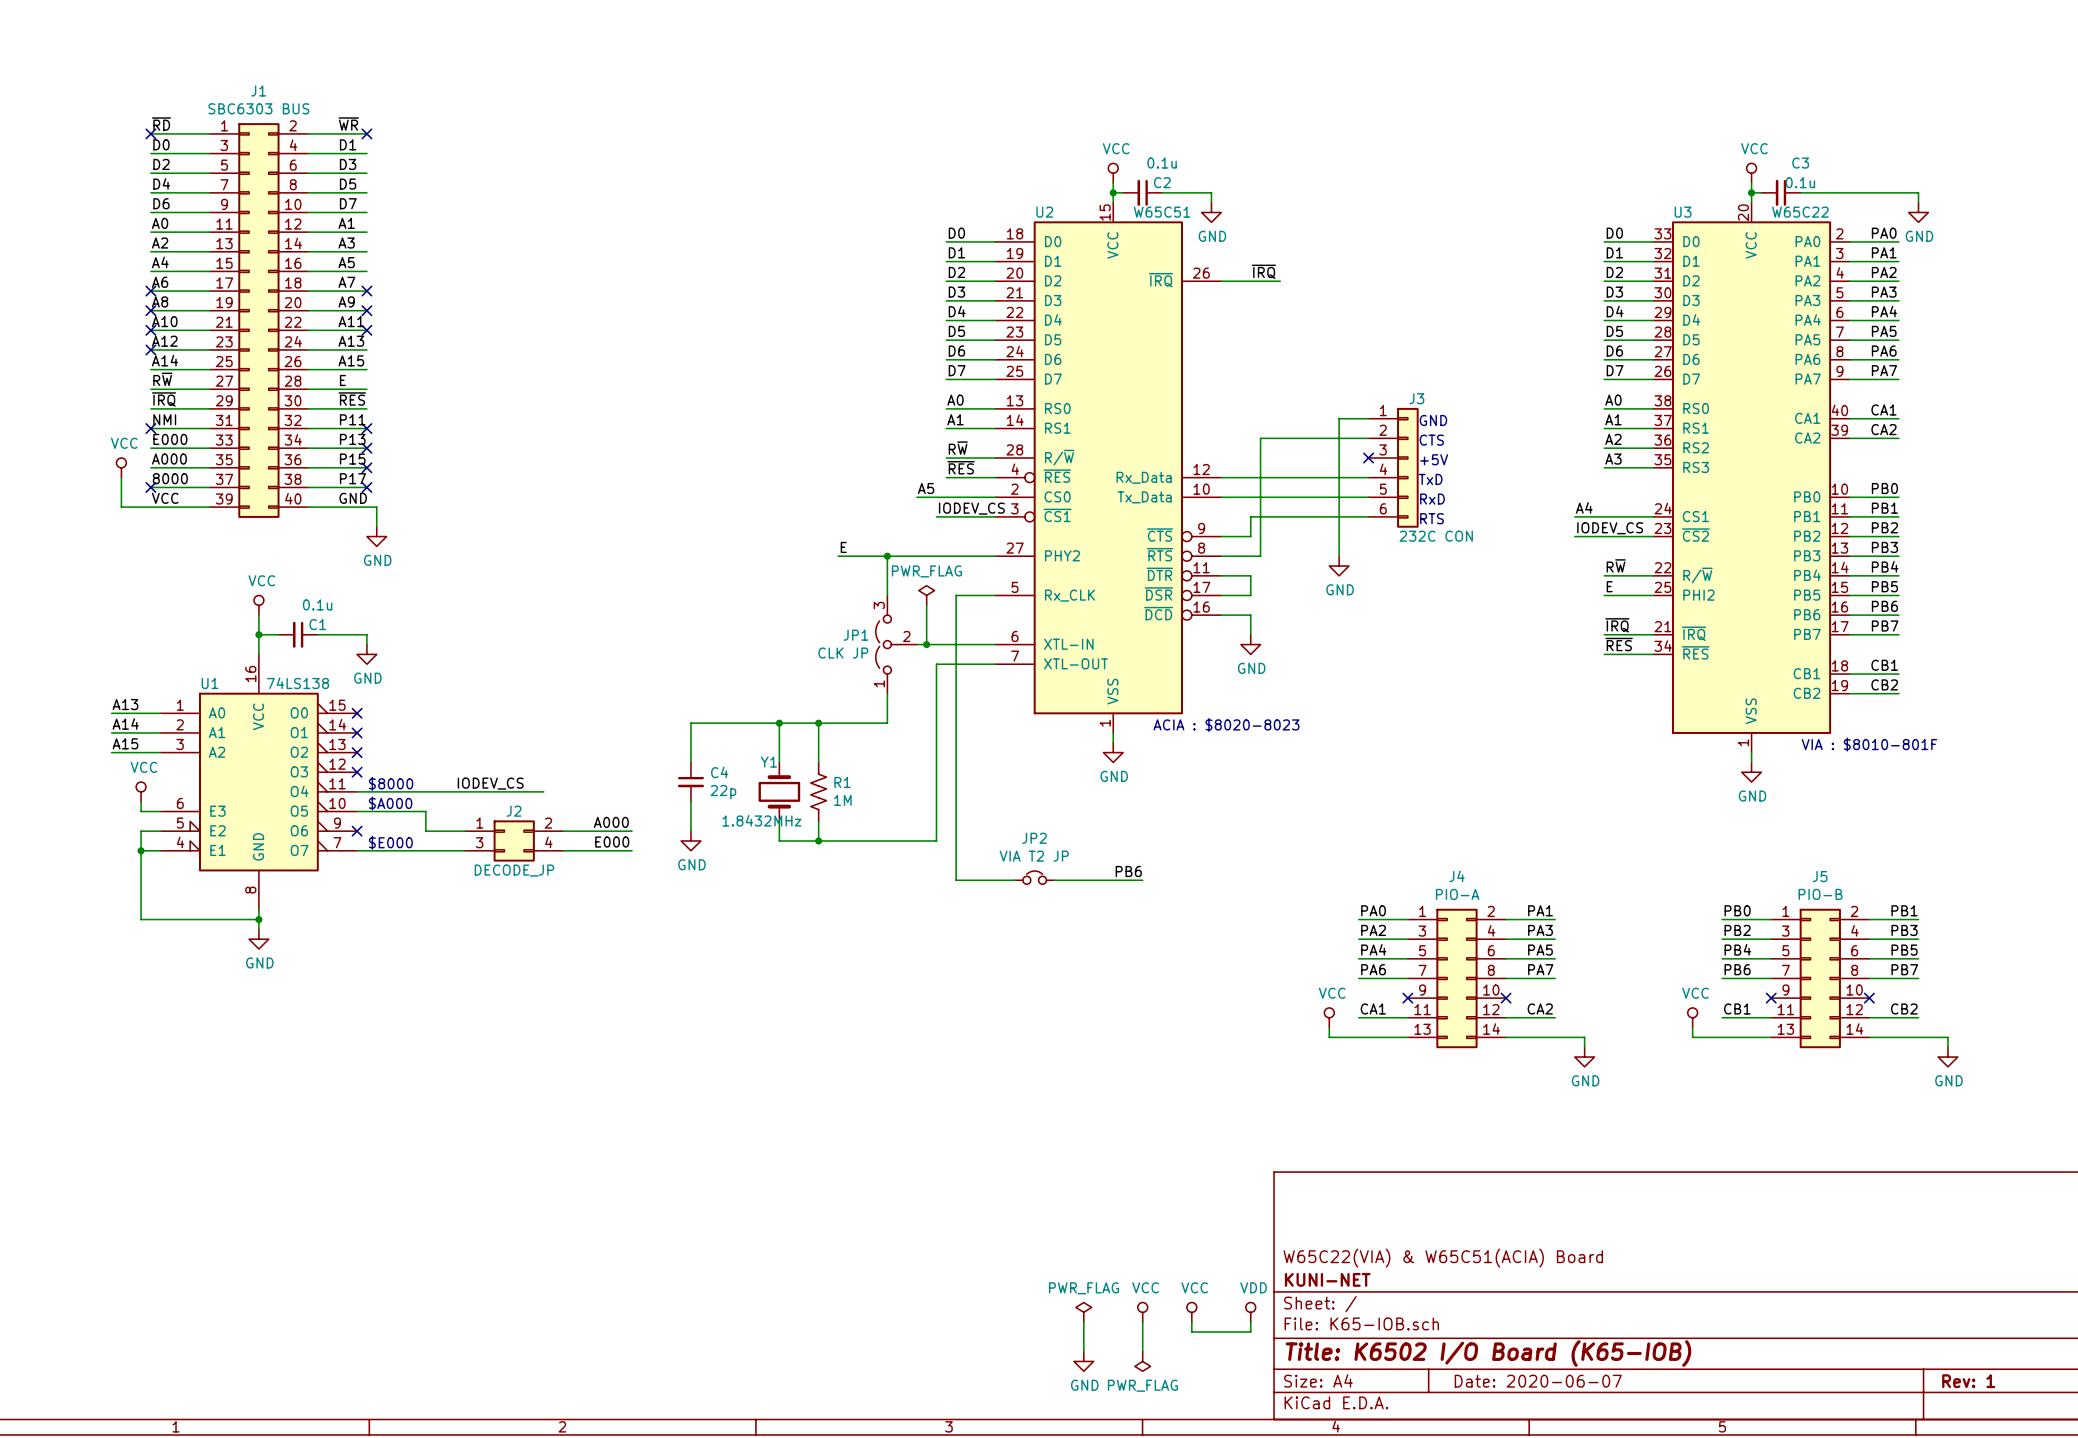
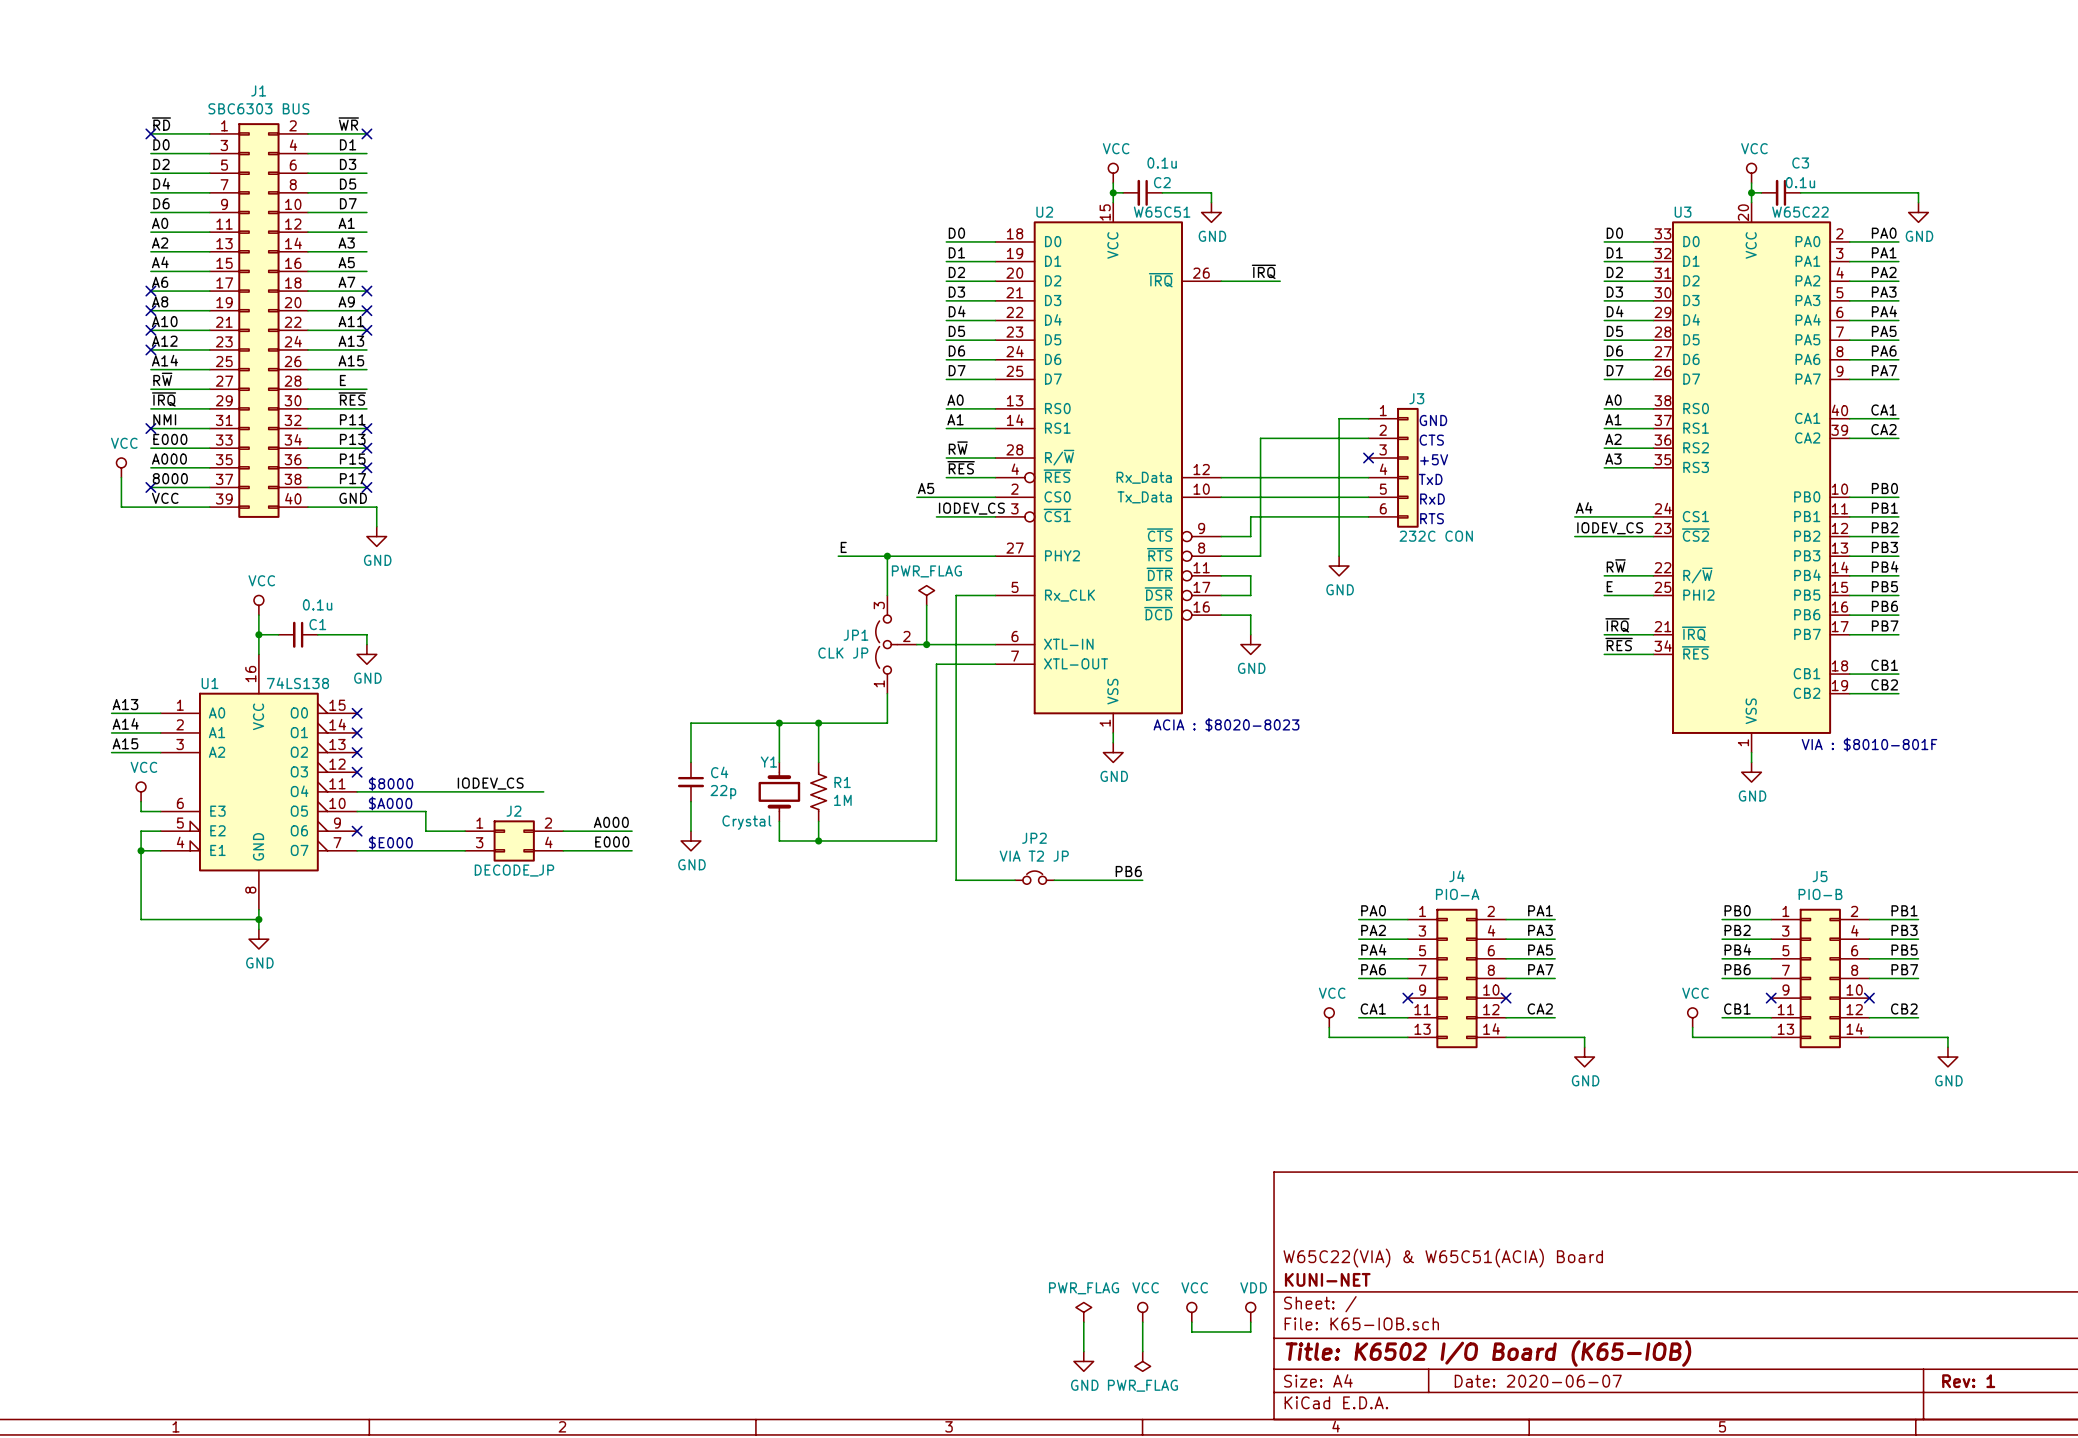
Y1 value: 1.8432MHz (761, 820) -> Crystal (746, 822)

